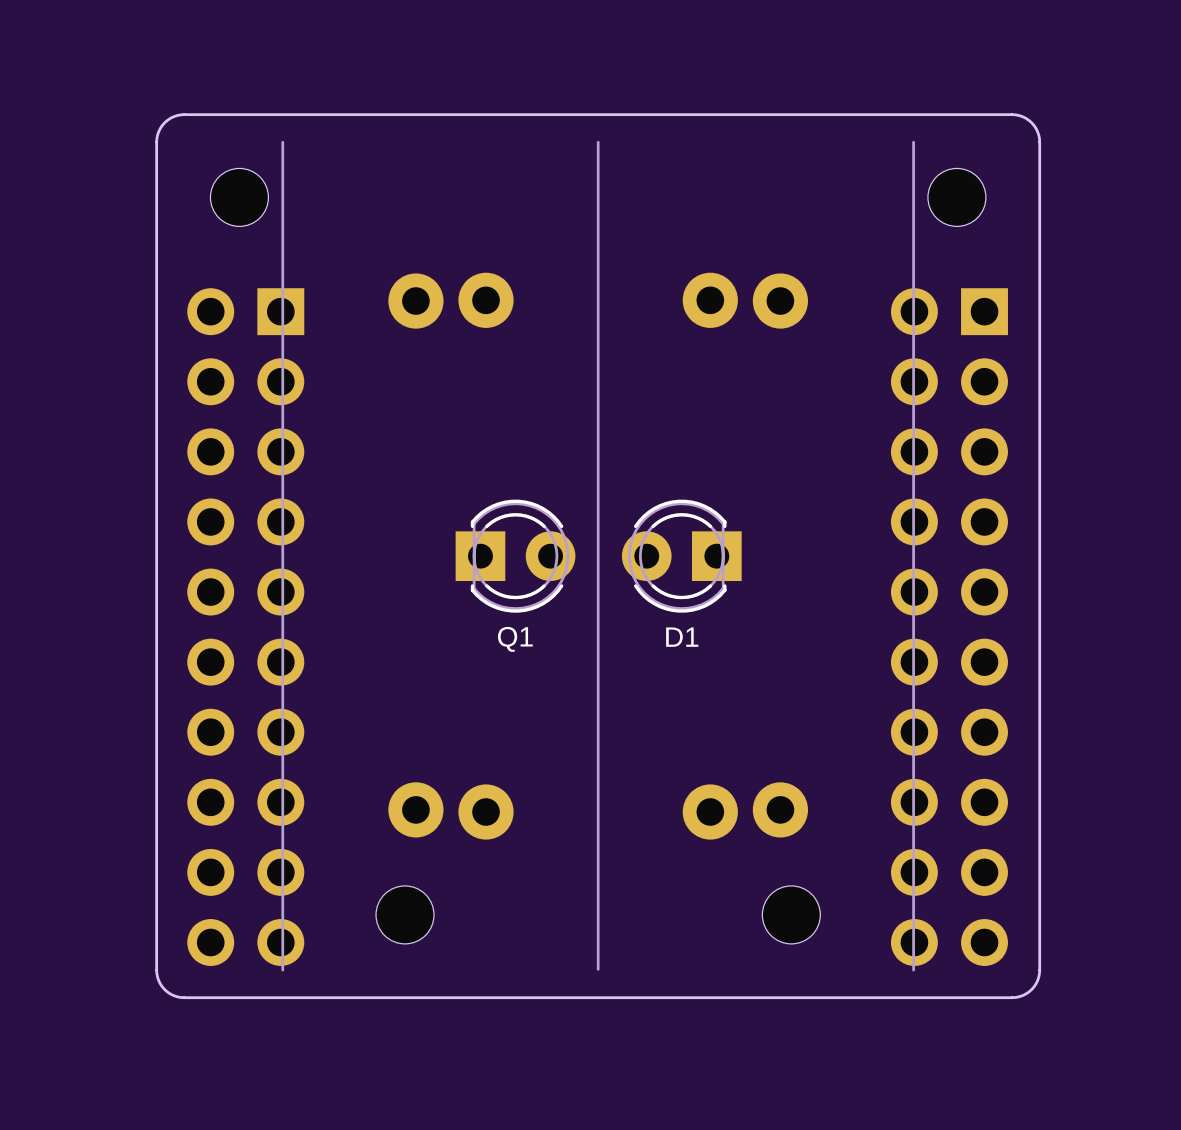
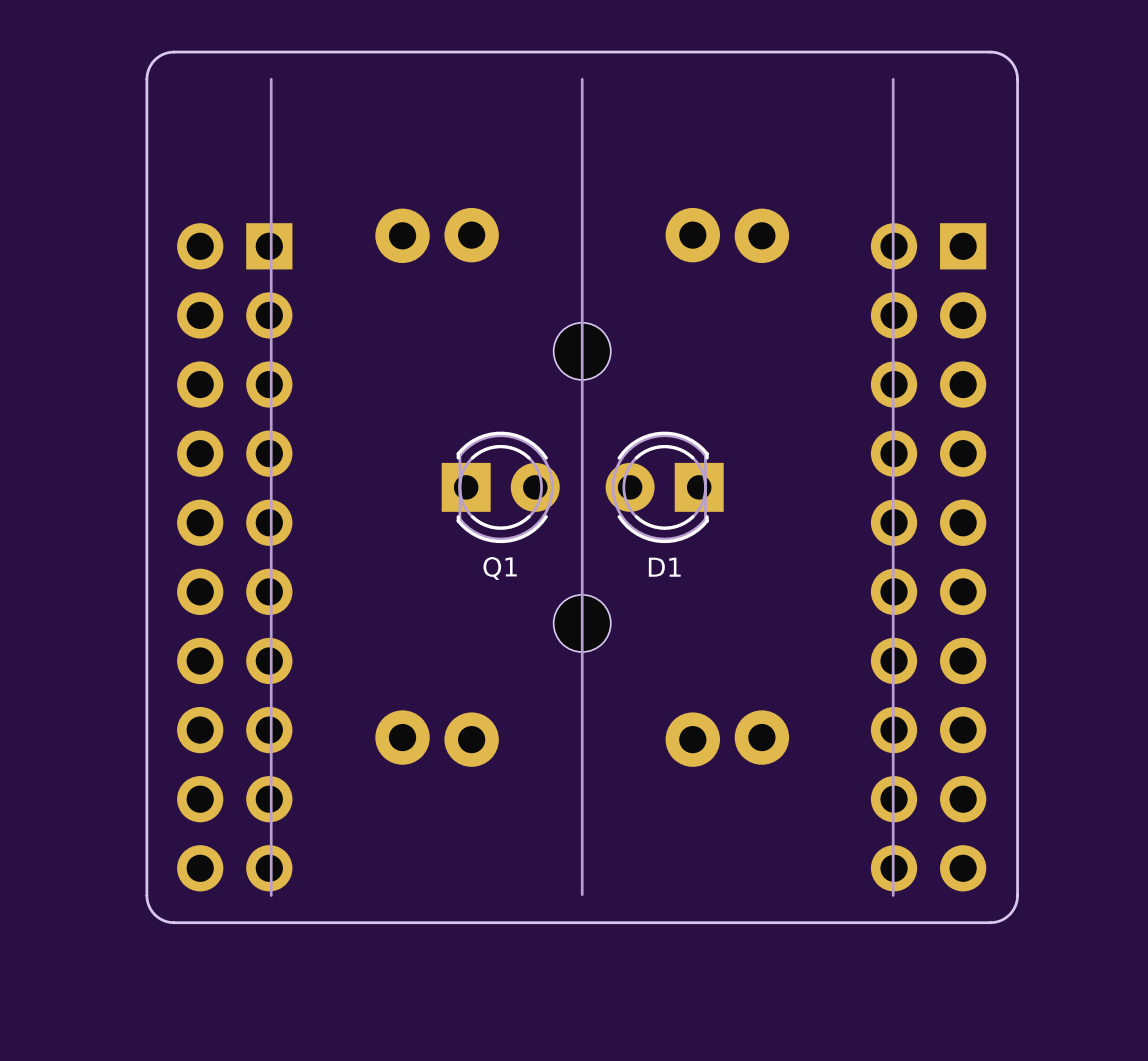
part: (239, 197) -> none
part: (956, 197) -> none
part: none -> (582, 351)
part: none -> (582, 623)
part: (405, 914) -> none
part: (791, 914) -> none

